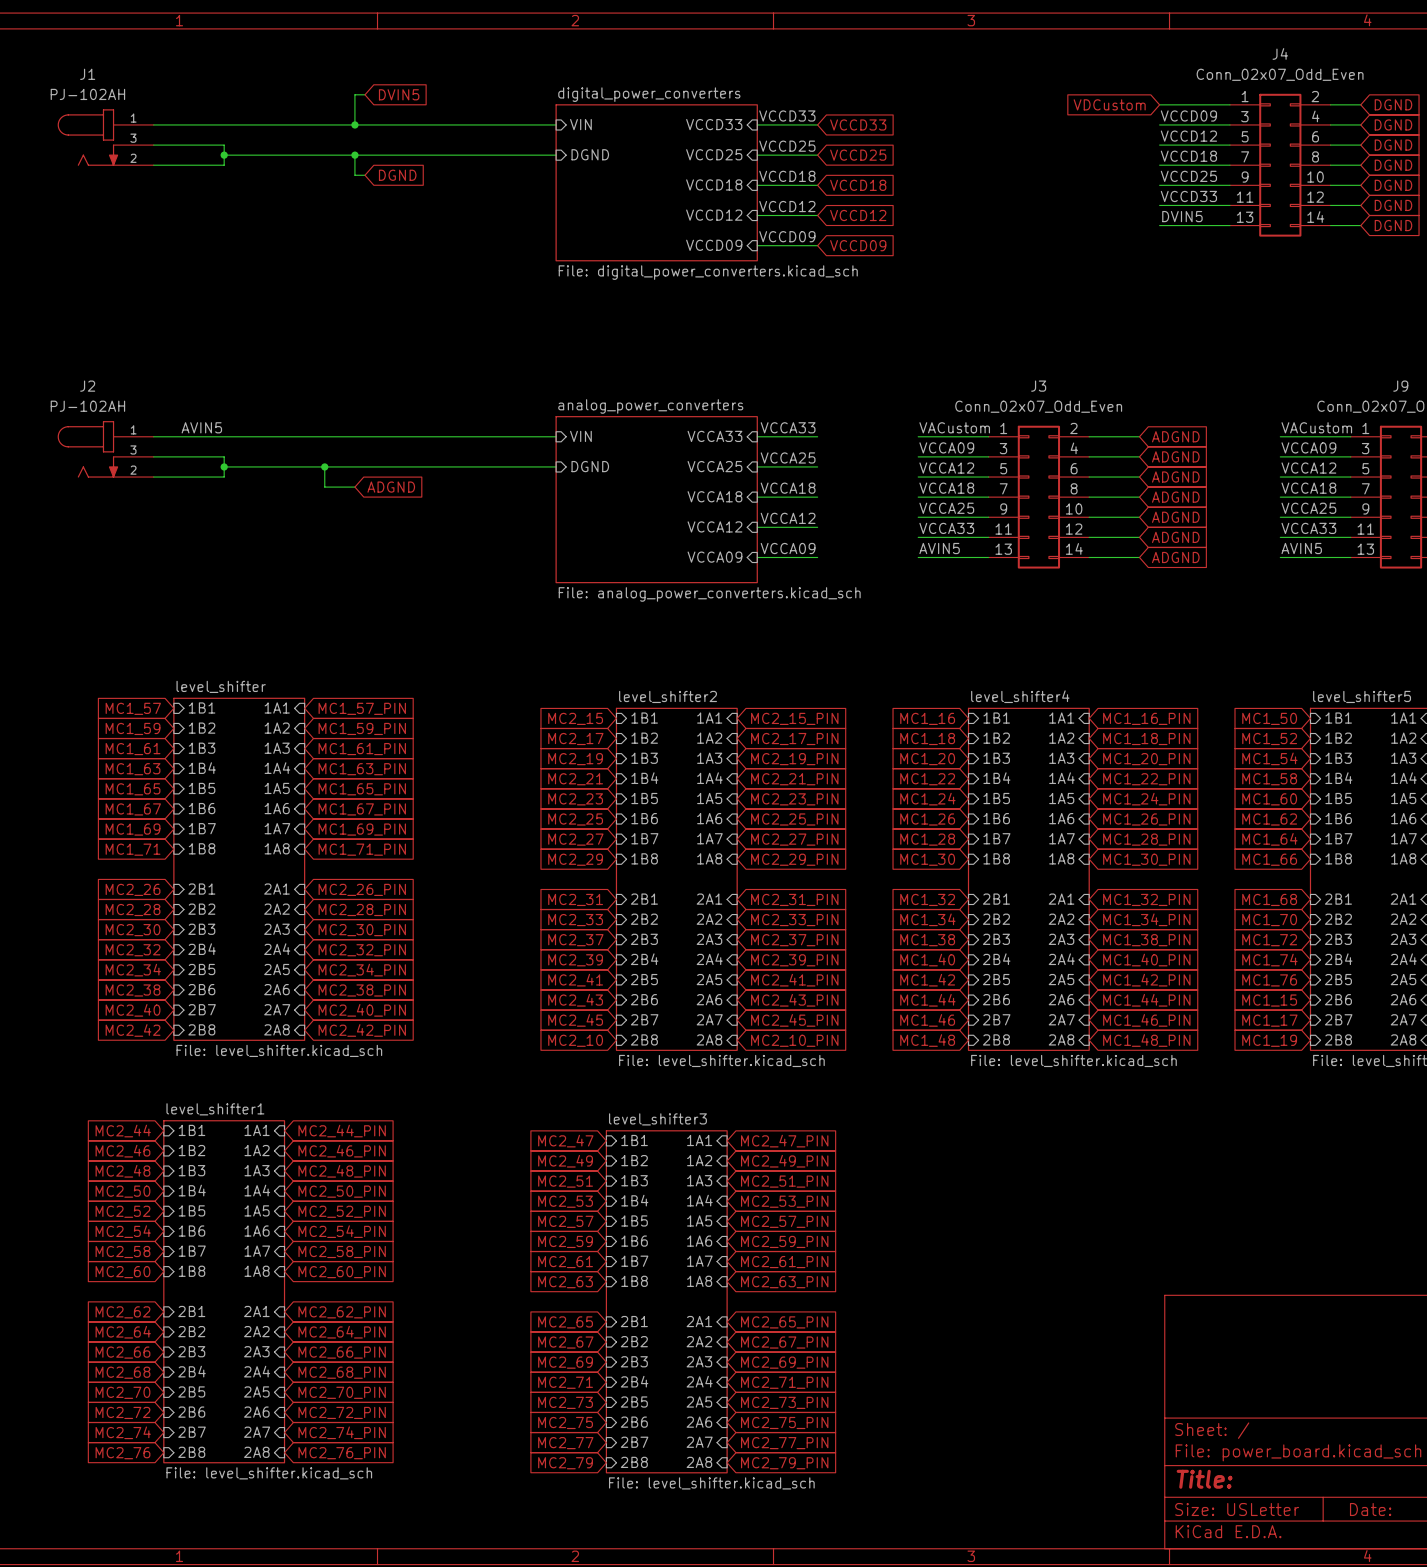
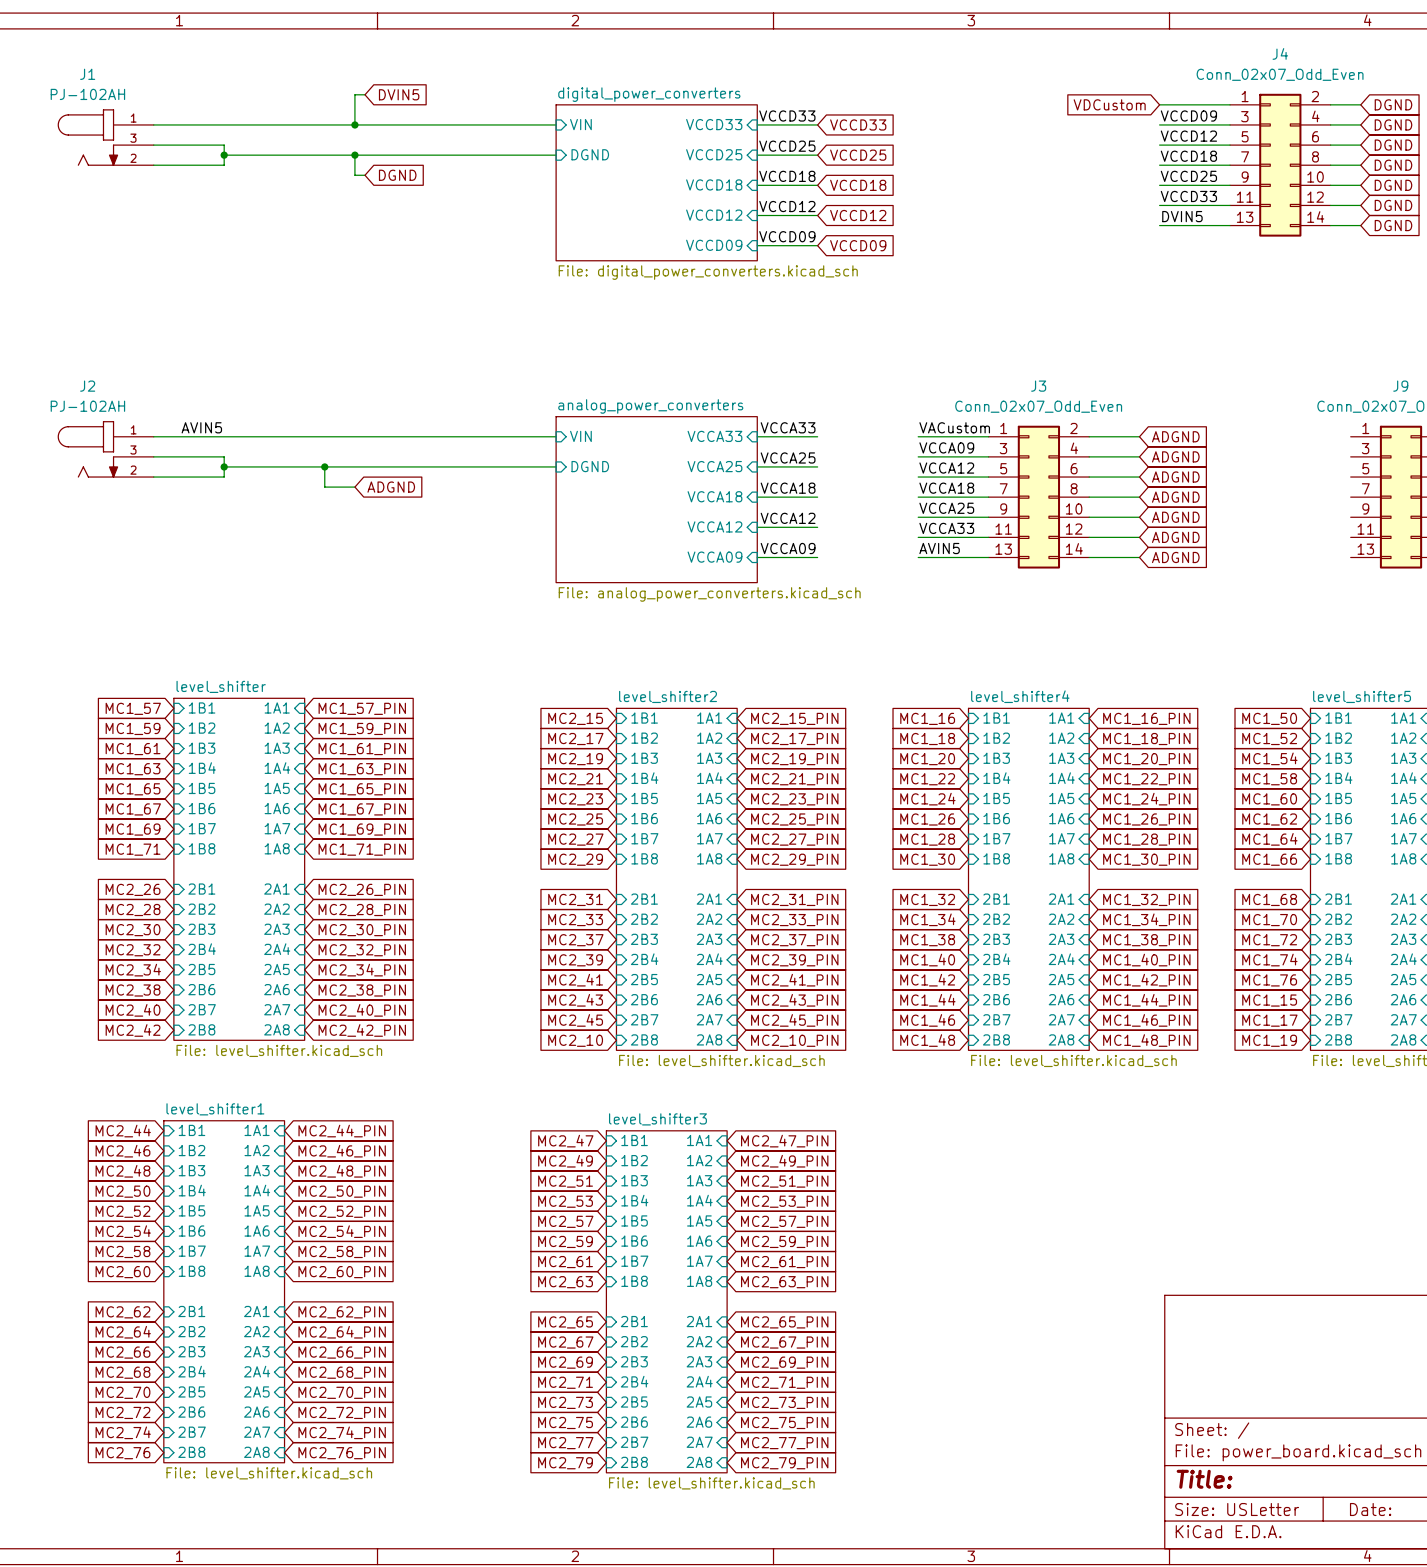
label: VACustom (1316, 427) -> none
wire: (1280, 436) (1350, 436) -> none
label: VCCA09 (1308, 447) -> none
wire: (1280, 456) (1350, 456) -> none
label: VCCA12 (1308, 468) -> none
wire: (1280, 477) (1350, 477) -> none
label: VCCA18 (1308, 488) -> none
wire: (1280, 497) (1350, 497) -> none
label: VCCA25 (1308, 508) -> none
wire: (1280, 517) (1350, 517) -> none
label: VCCA33 (1308, 528) -> none
wire: (1280, 537) (1350, 537) -> none
label: AVIN5 (1301, 548) -> none
wire: (1280, 557) (1350, 557) -> none

